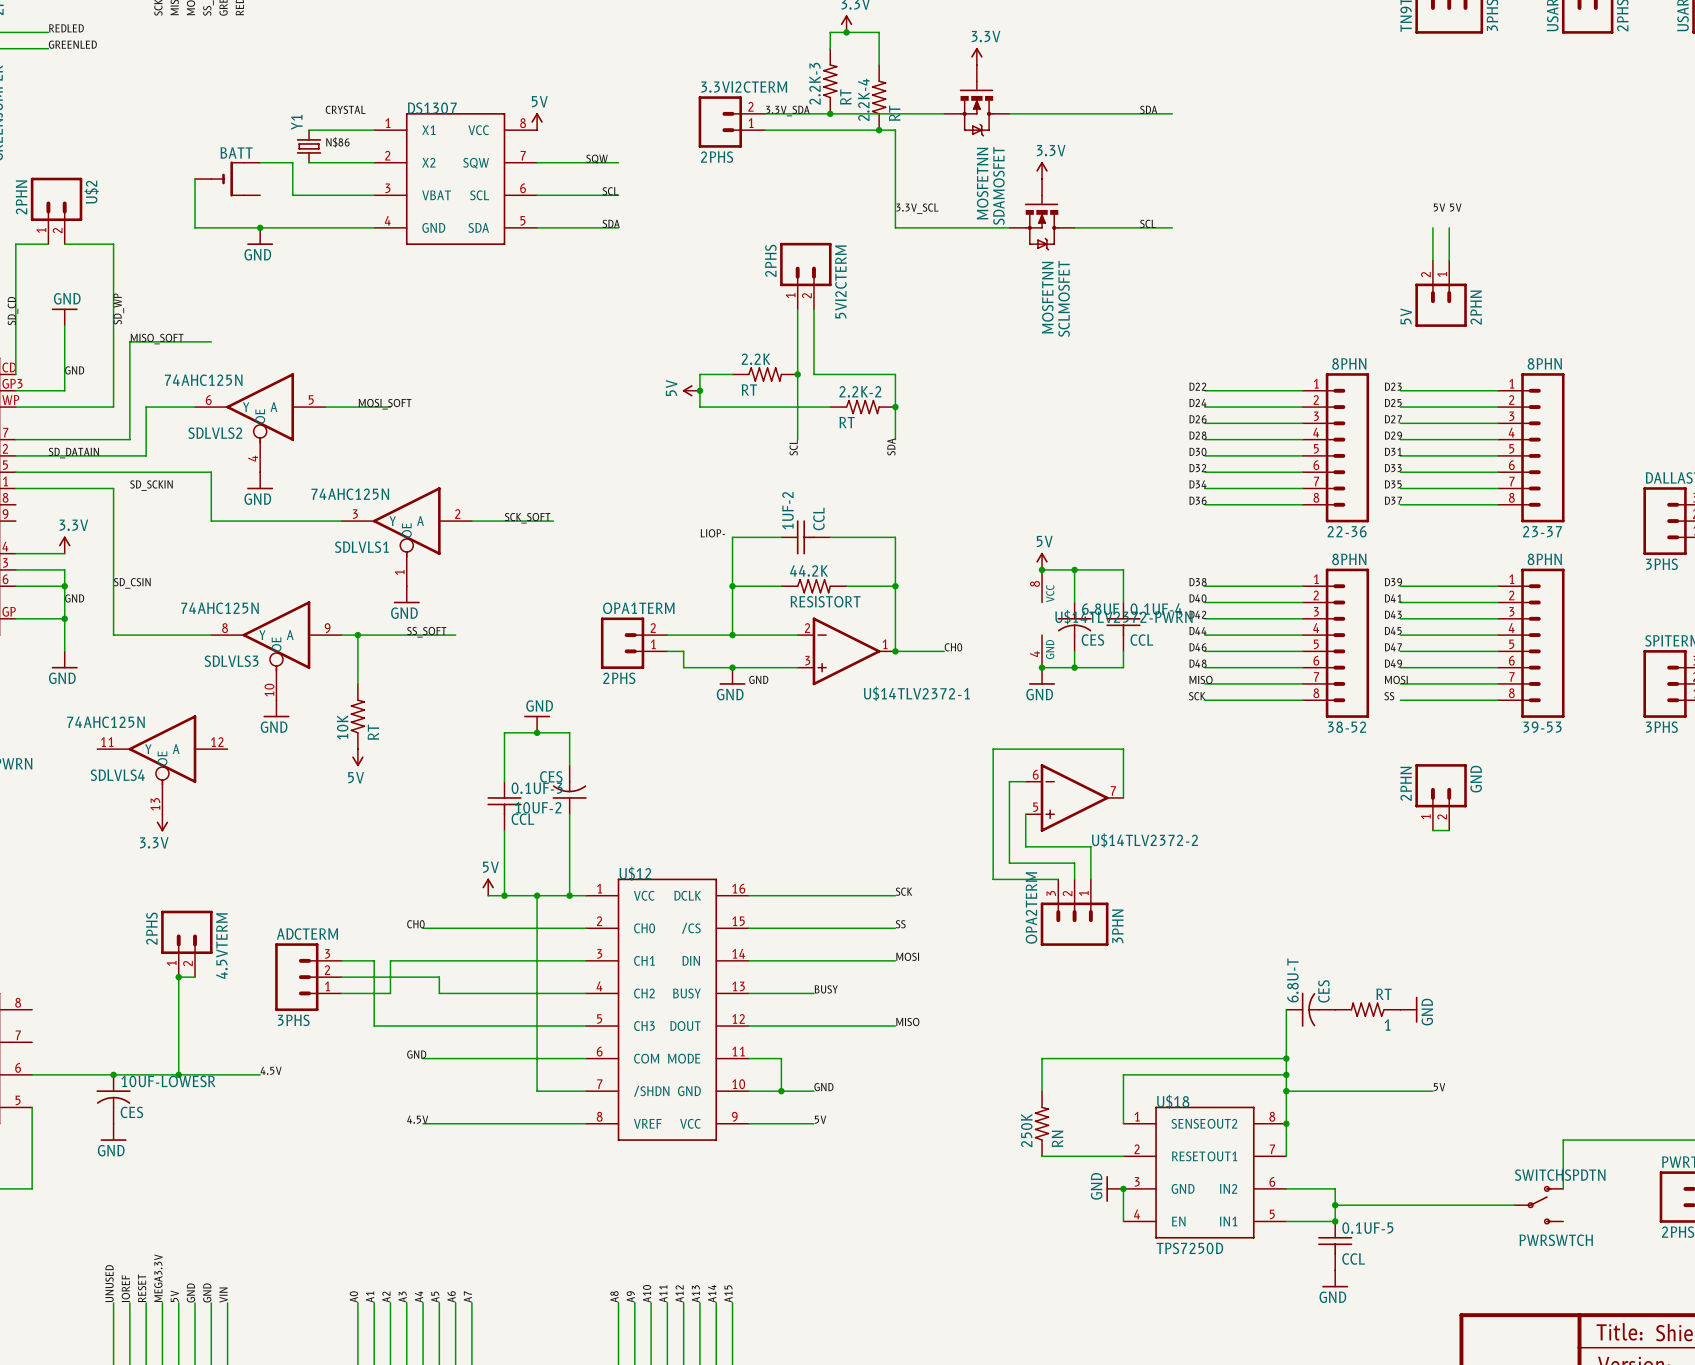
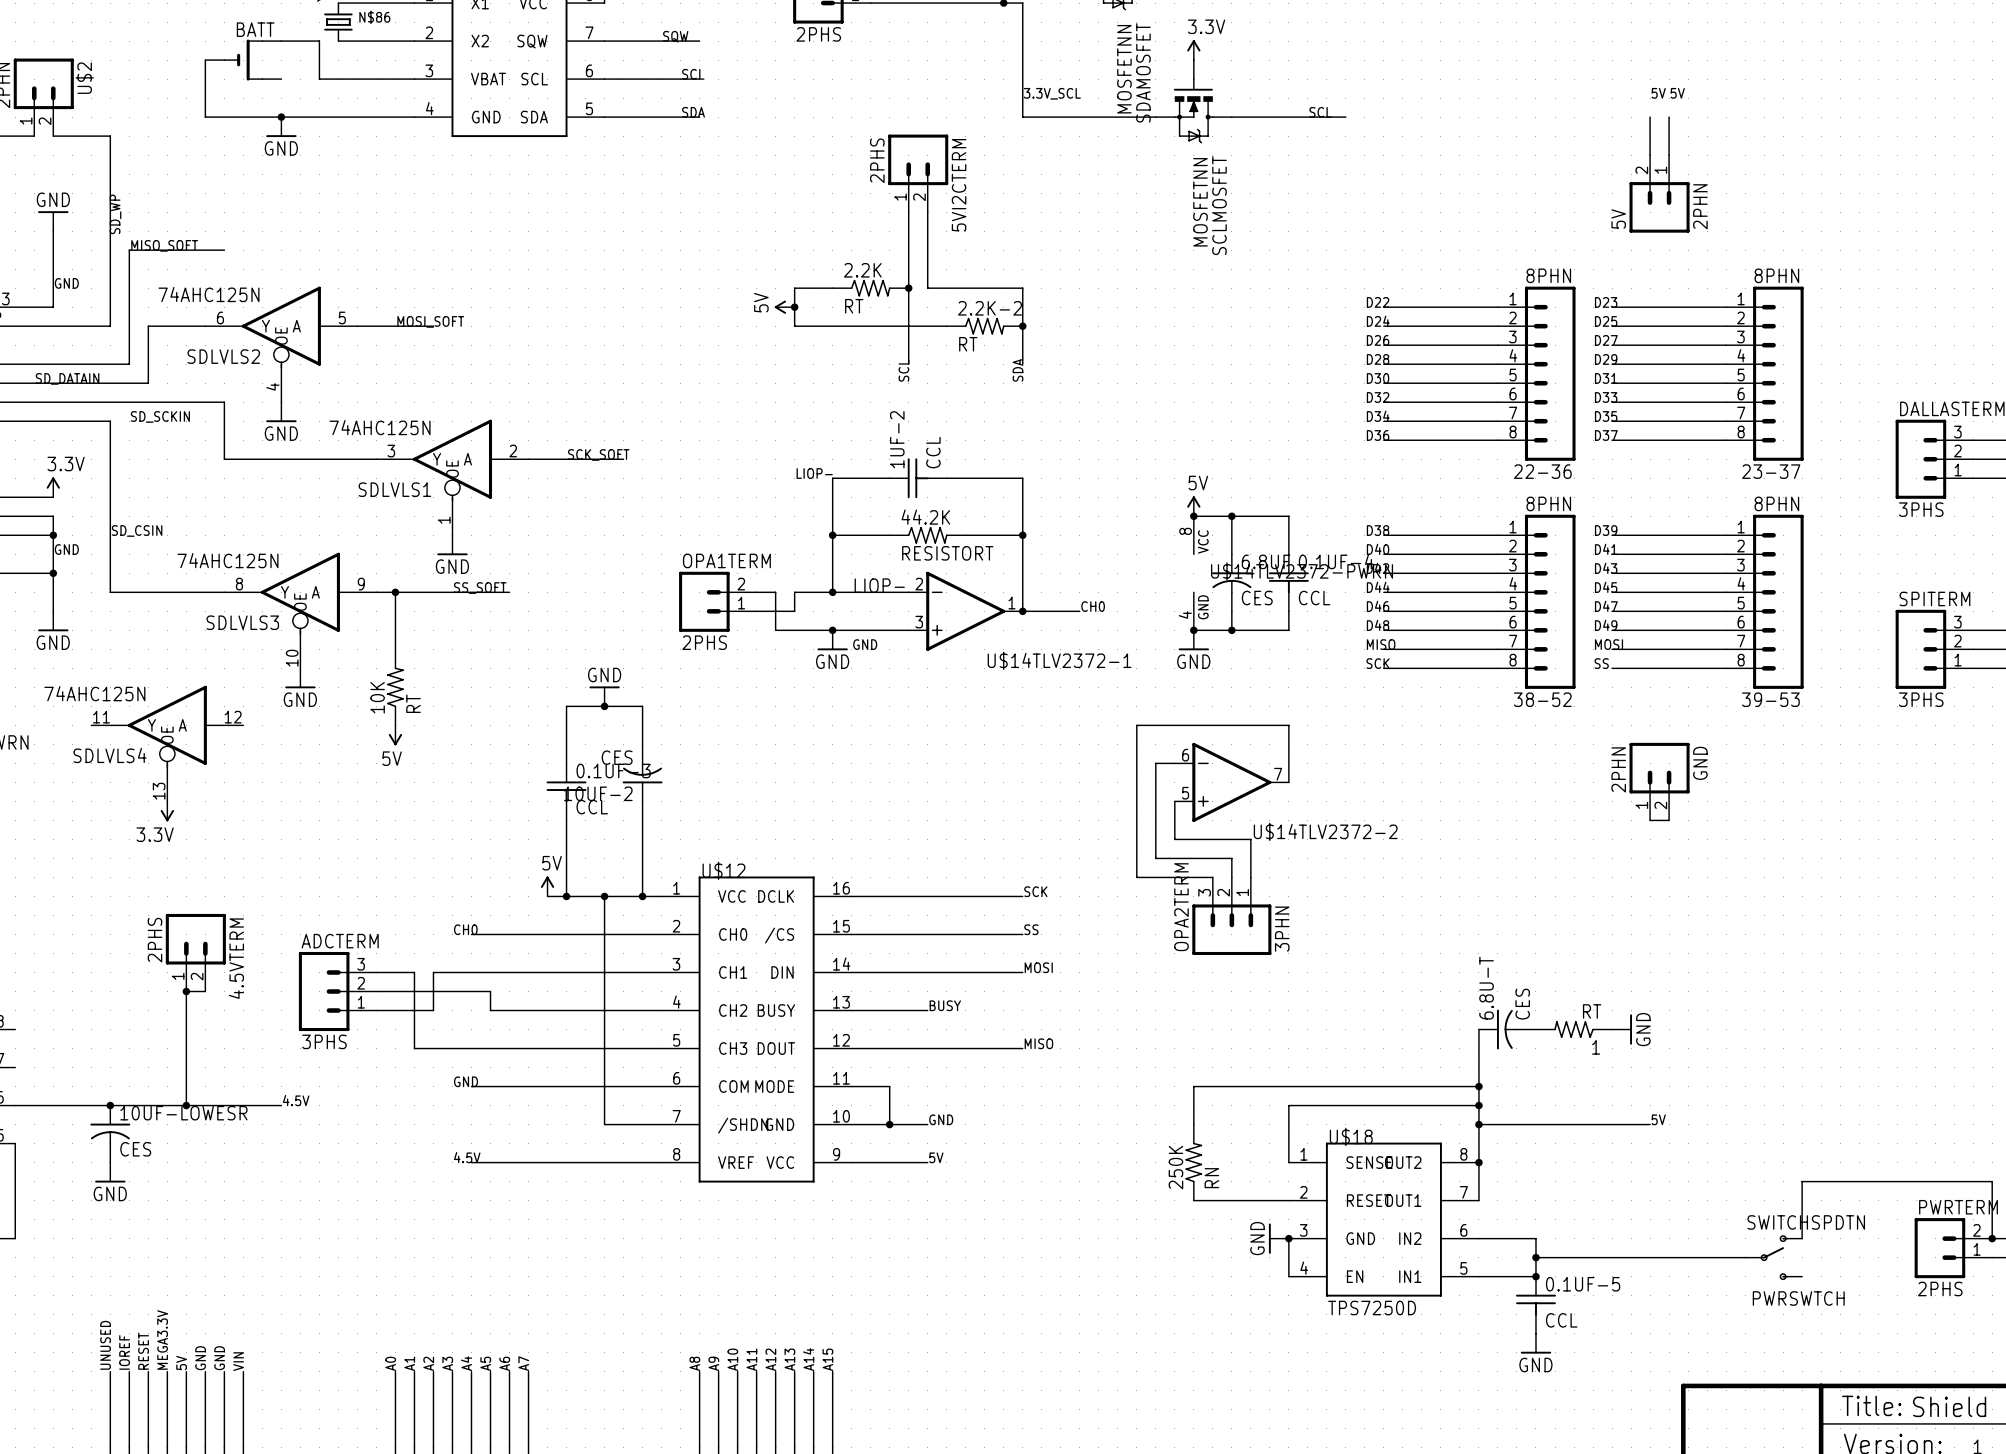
label: none -> LIOP- (879, 585)
wire: (683, 635) (699, 635) -> (775, 592) (775, 611) (794, 611) (794, 592)

